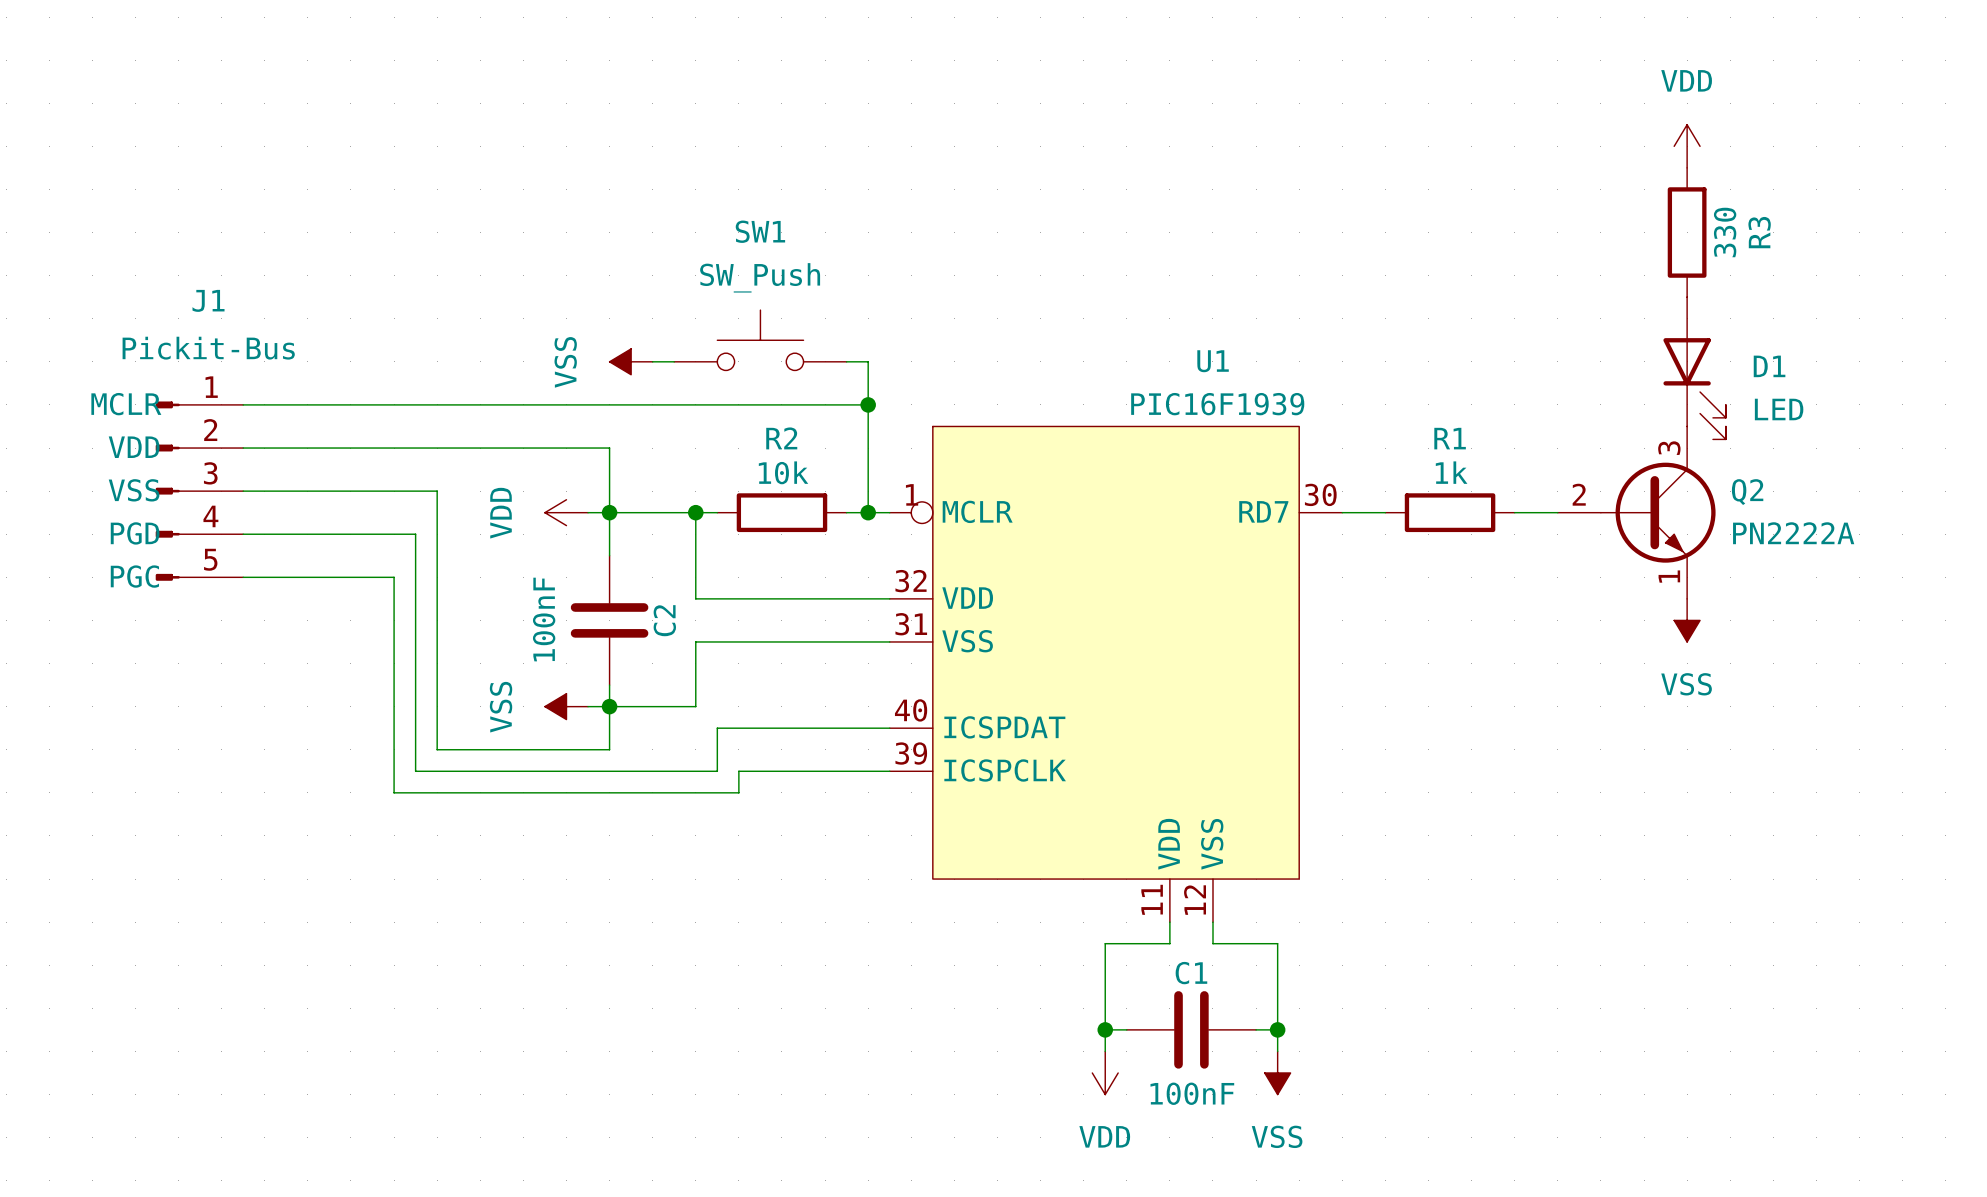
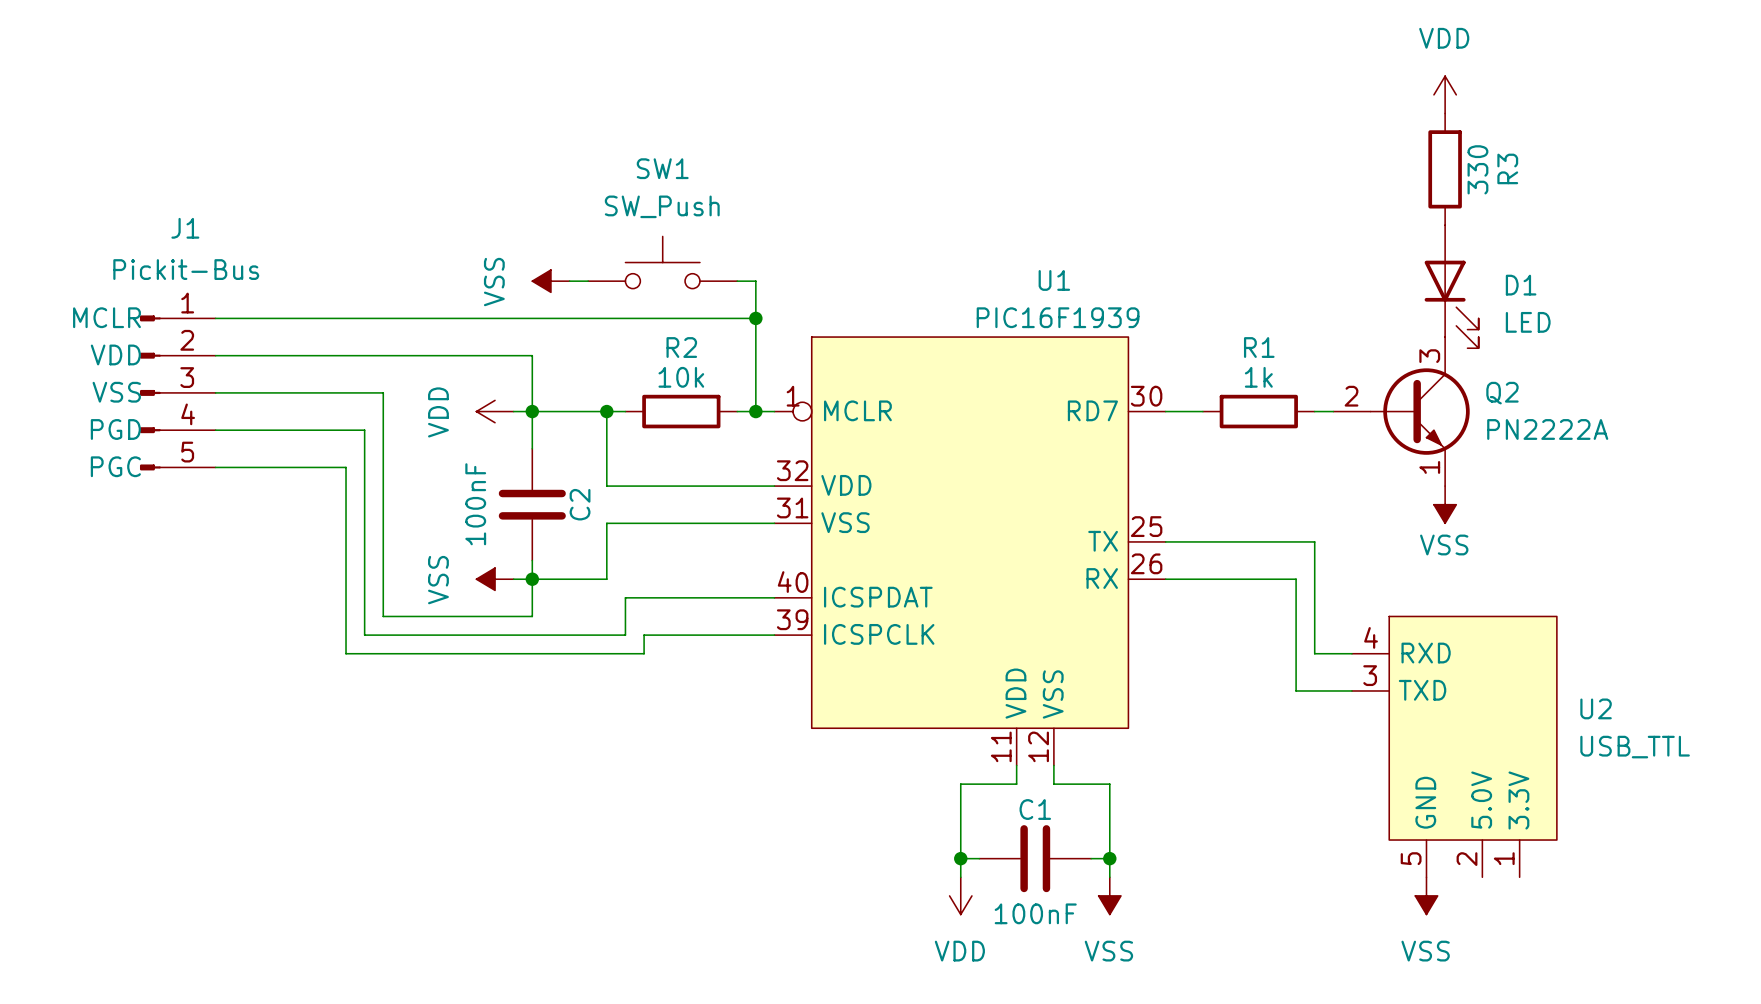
power symbol position: VDD (1687, 146) -> VDD (1445, 94)
R3 position: (1687, 232) -> (1445, 169)
D1 position: (1694, 368) -> (1451, 286)
U1 symbol: [889, 426, 1343, 923] -> [774, 337, 1166, 766]
Q2 position: (1636, 512) -> (1401, 411)
power symbol position: VSS (1687, 620) -> VSS (1445, 504)
wire: none -> (1165, 541) (1314, 541) (1314, 653) (1351, 653)
power symbol text position: VSS (1686, 684) -> VSS (1444, 544)
wire: none -> (1165, 579) (1296, 579) (1296, 690) (1351, 690)
U2: none -> USB_TTL (1454, 746)
power symbol: none -> VSS (1426, 895)

